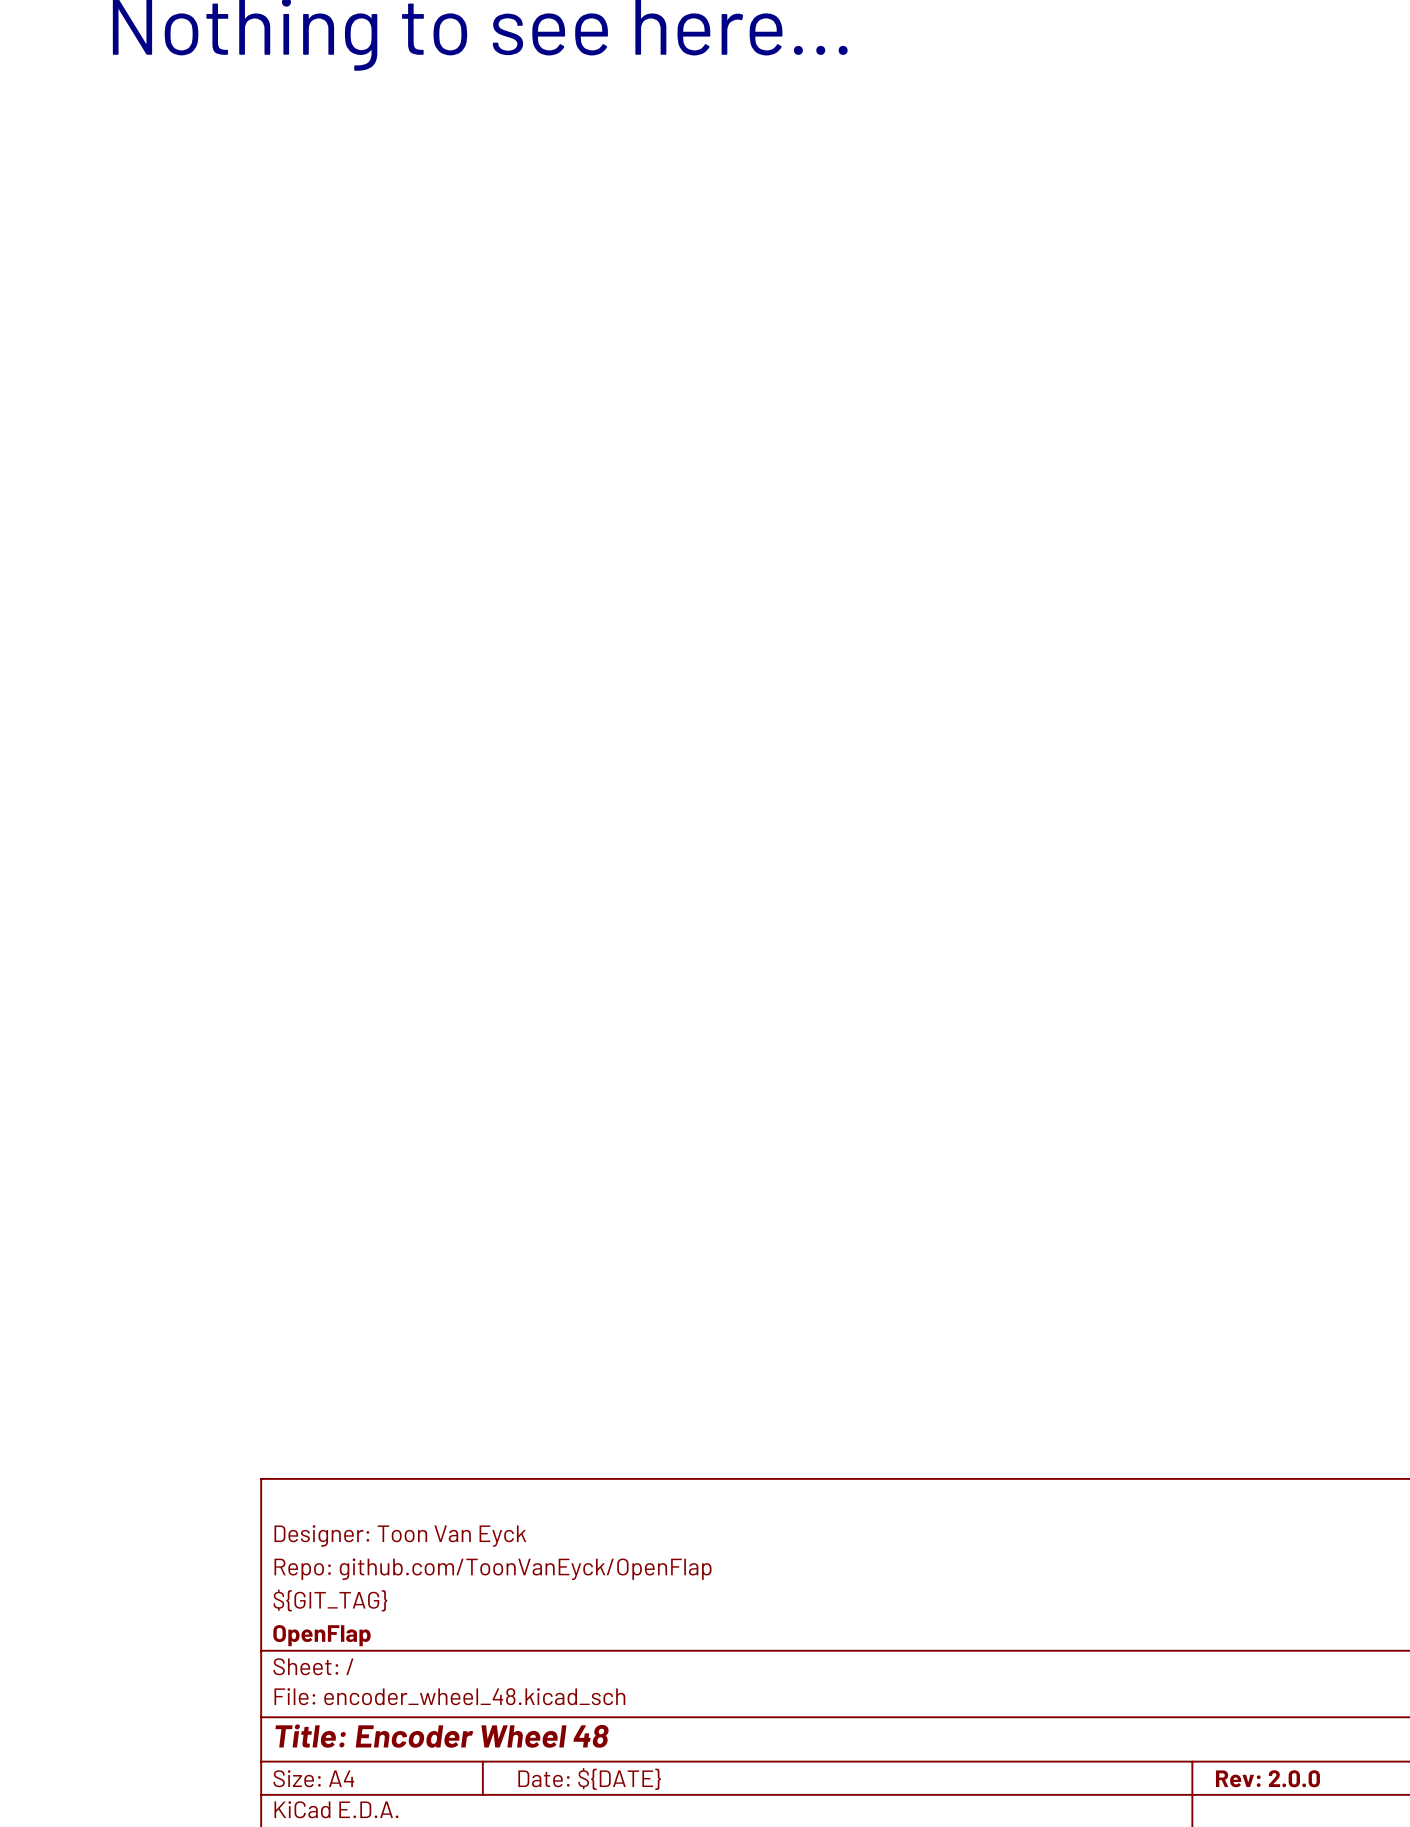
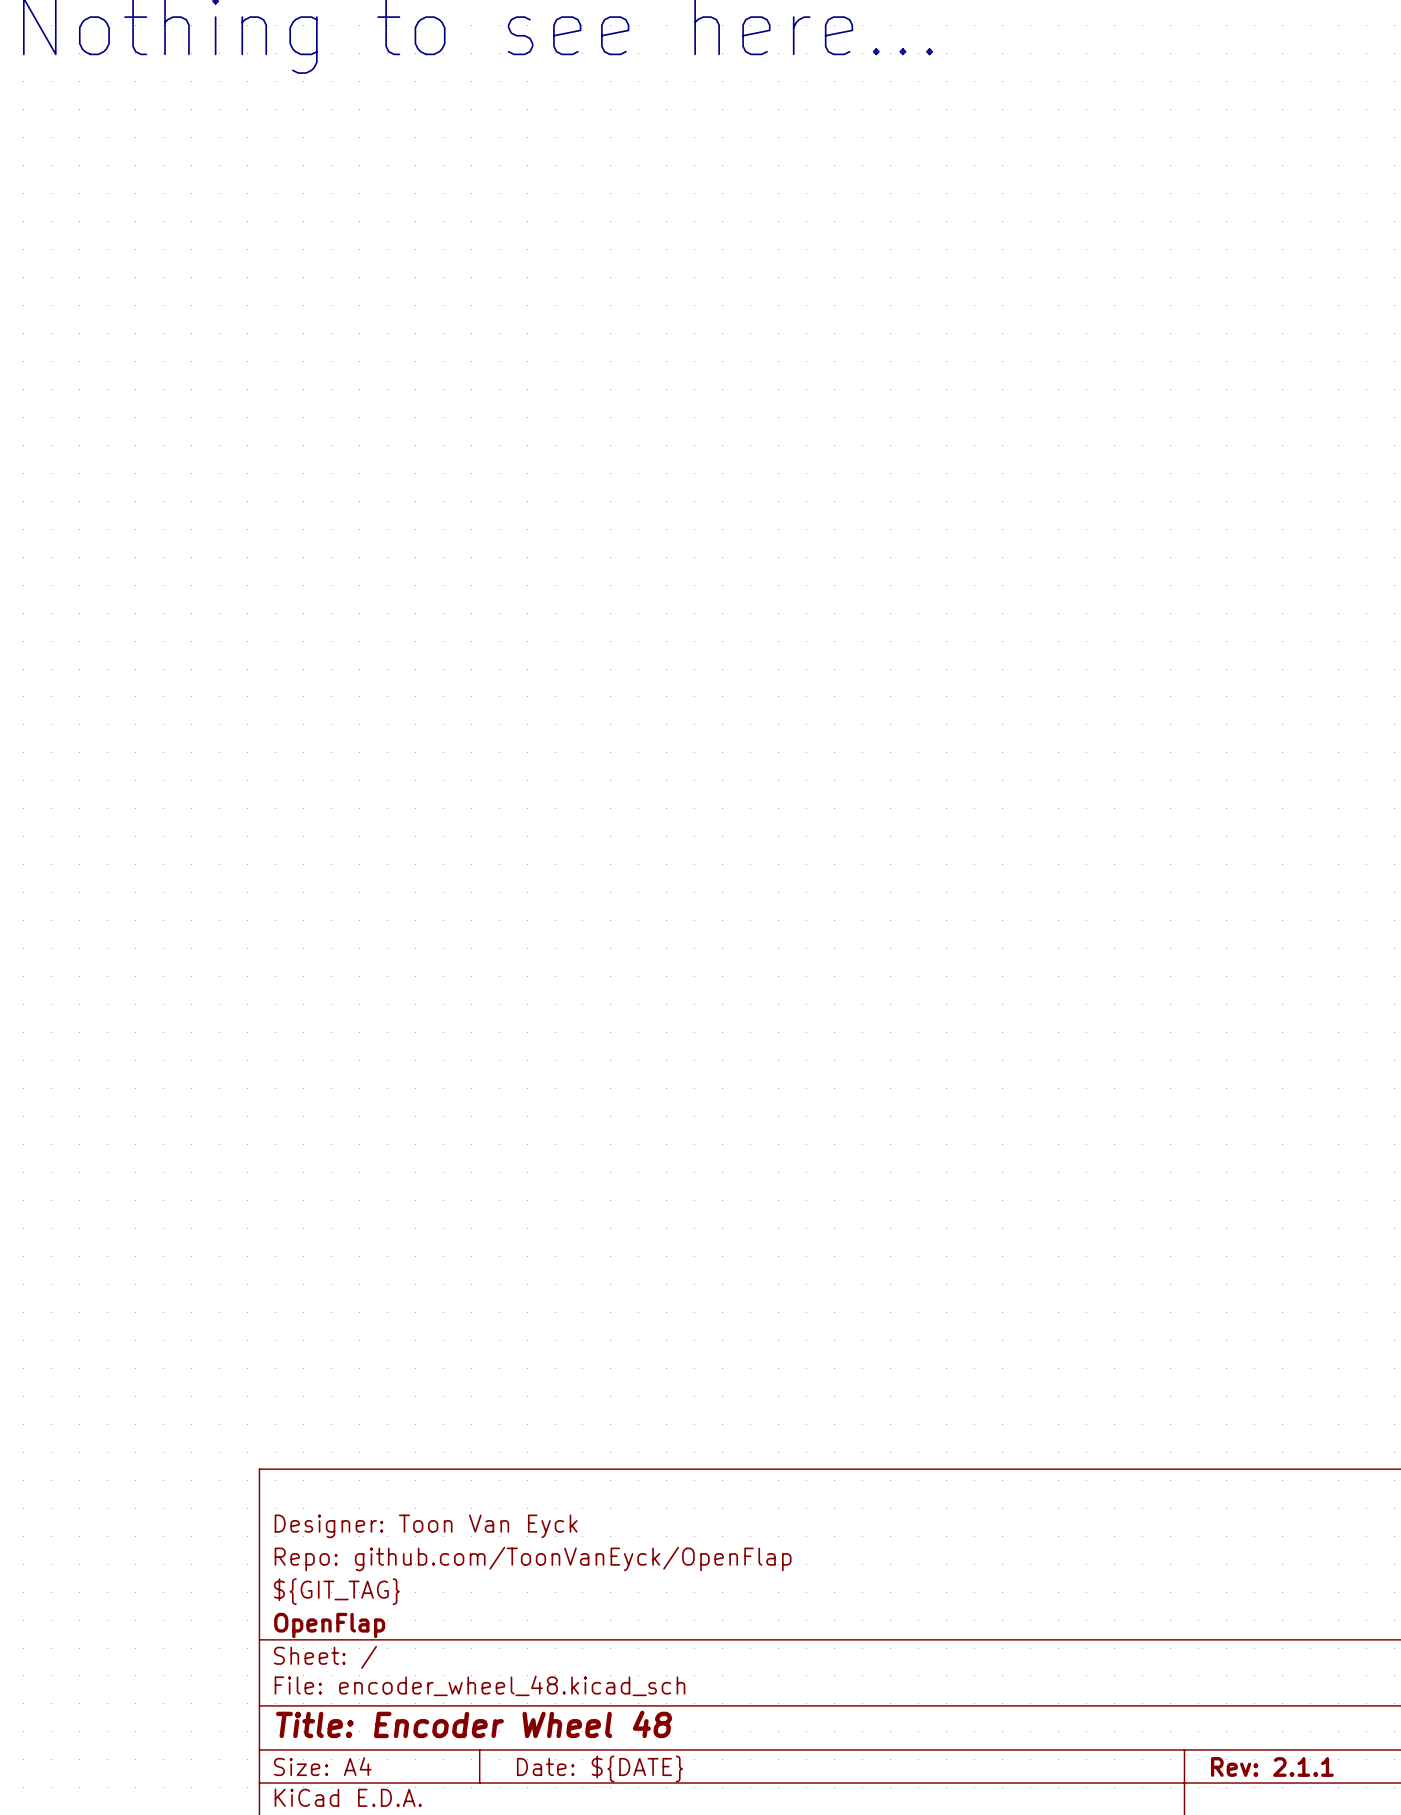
title block: Rev: 2.0.0 (1267, 1778) -> Rev: 2.1.1 (1272, 1766)

